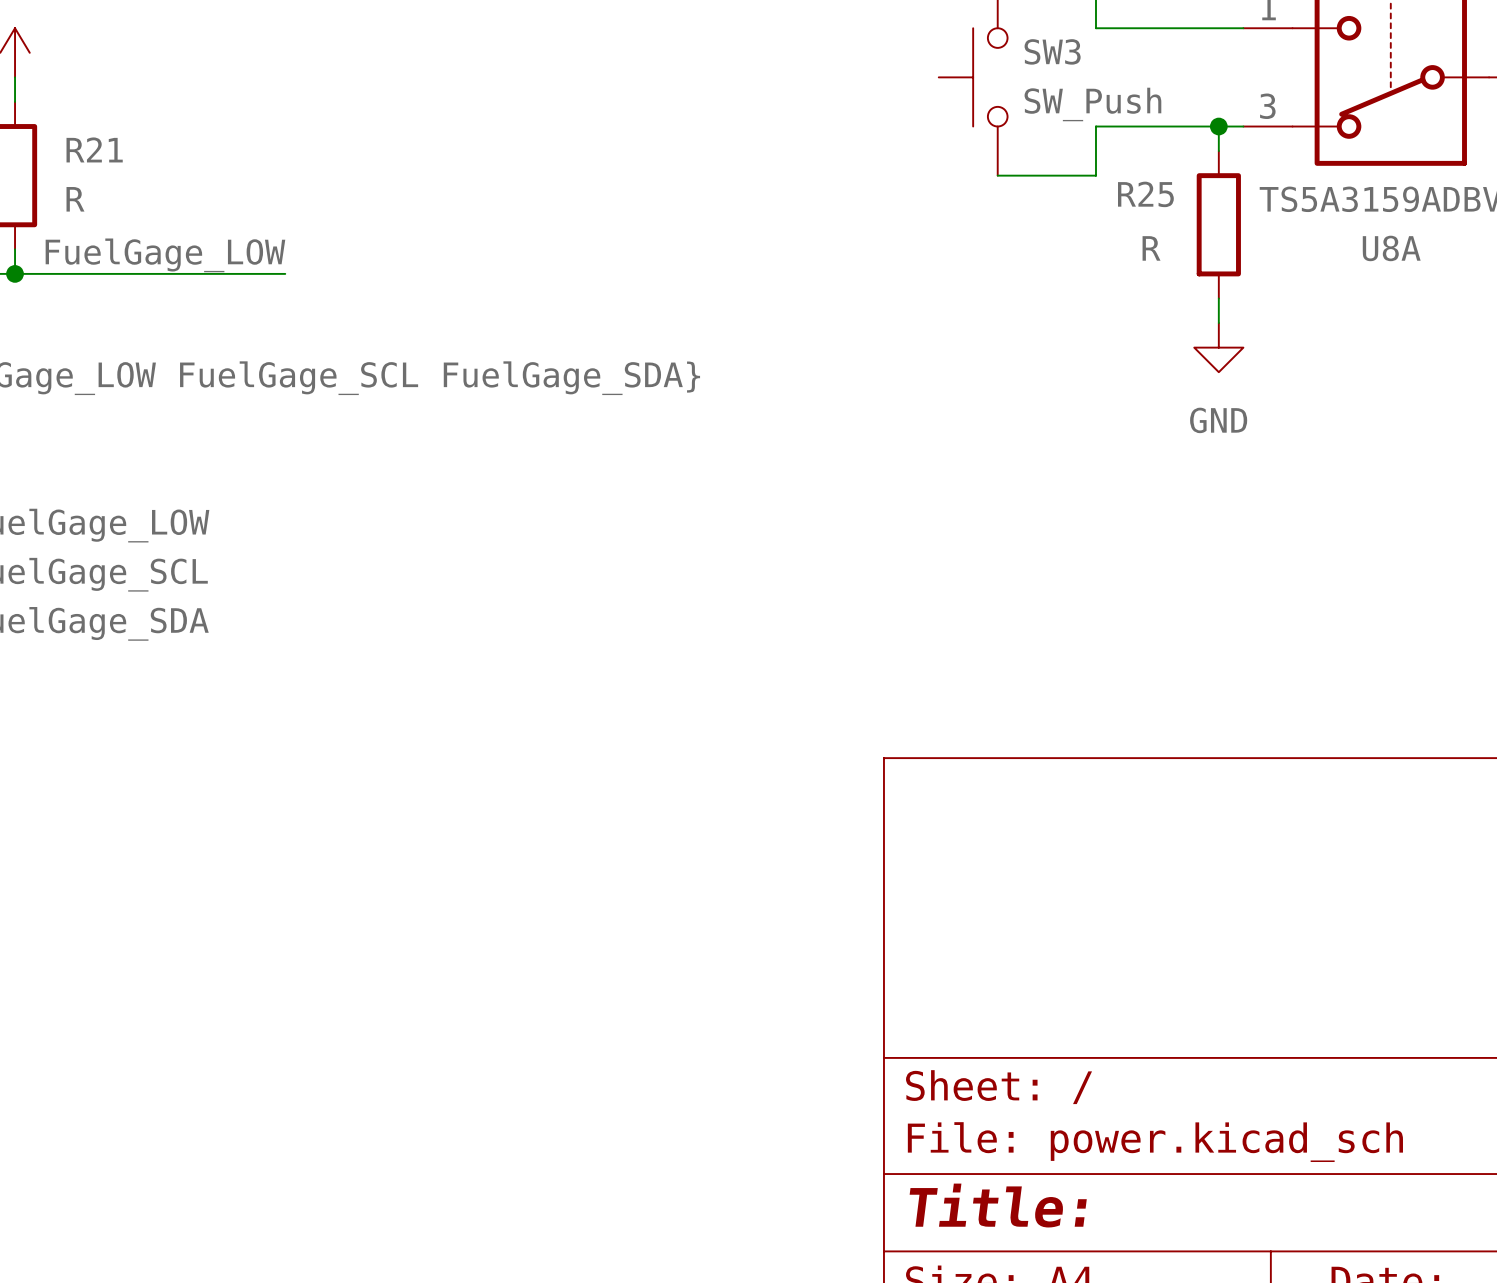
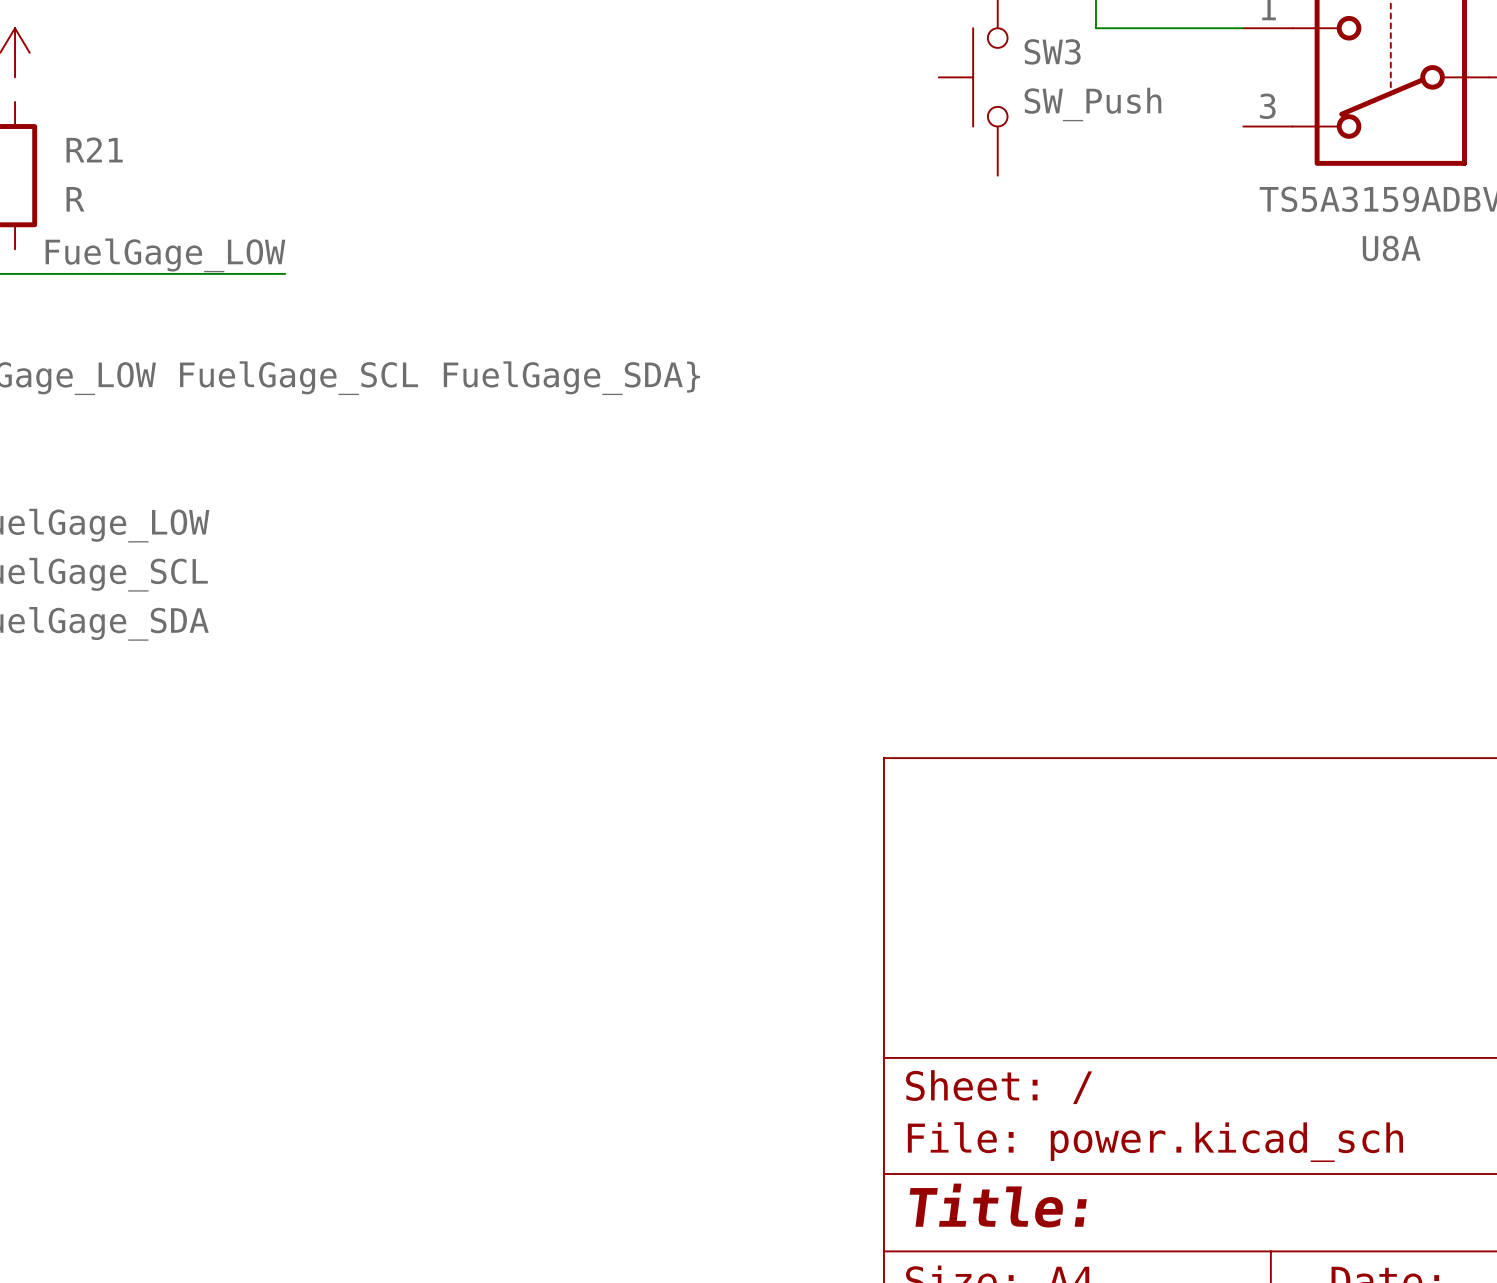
wire: (15, 77) (15, 101) -> none
wire: (1218, 126) (1218, 151) -> none
junction: (1218, 126) -> none
wire: (1243, 126) (1095, 126) (1095, 175) (997, 175) -> none
R25: R (1218, 224) -> none
wire: (15, 249) (15, 273) -> none
junction: (15, 273) -> none
wire: (1218, 298) (1218, 323) -> none
power symbol: GND (1218, 347) -> none

